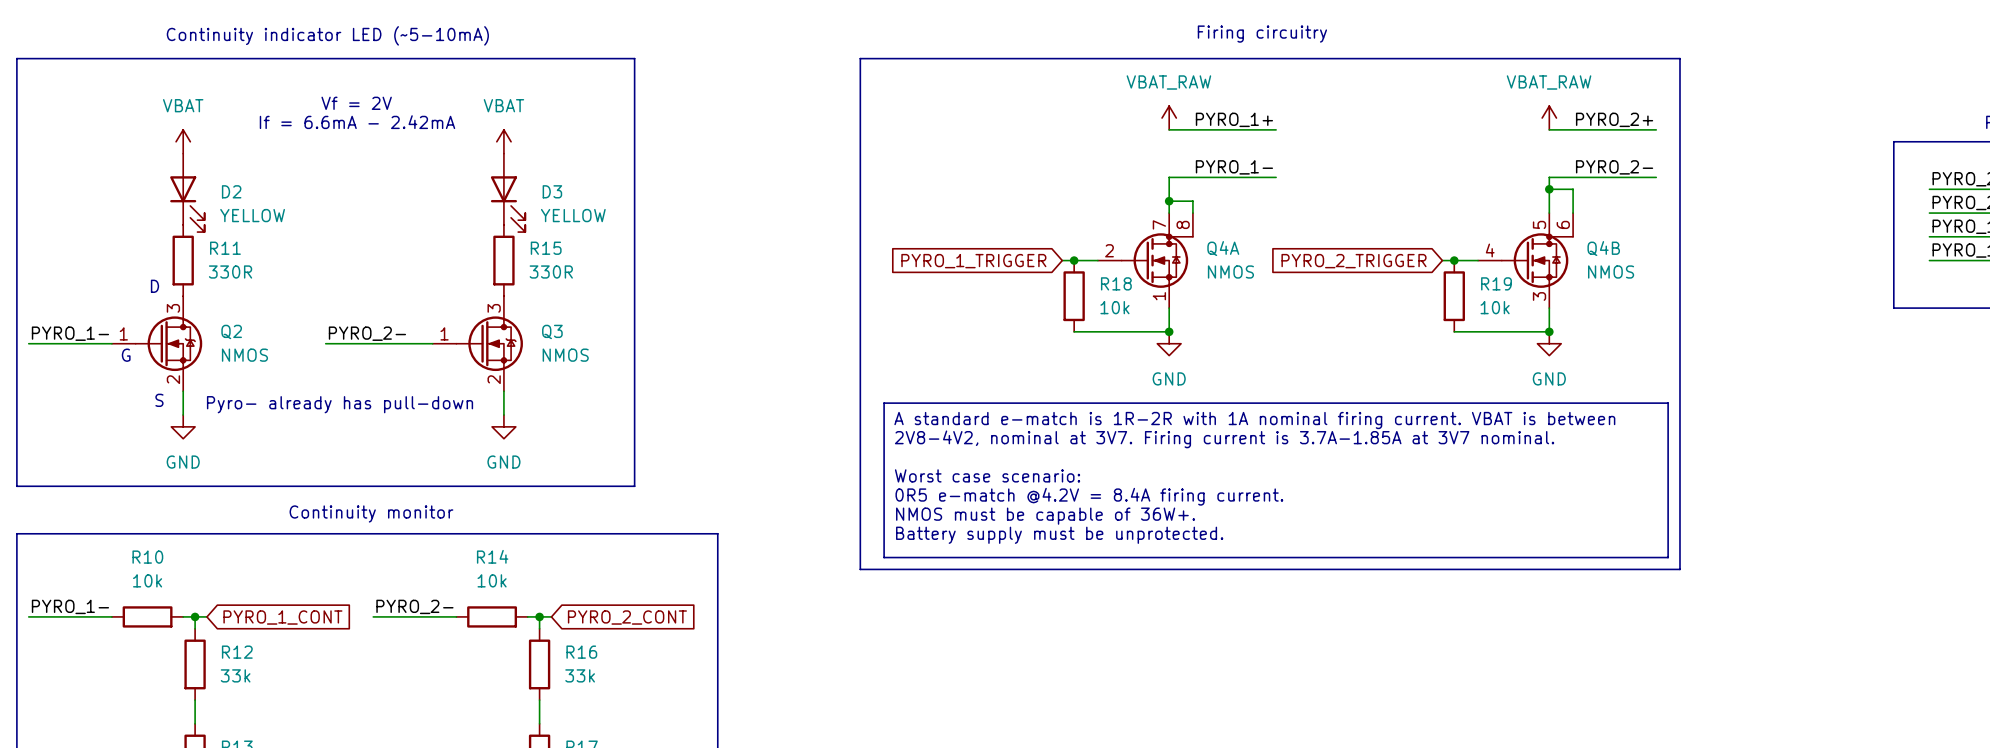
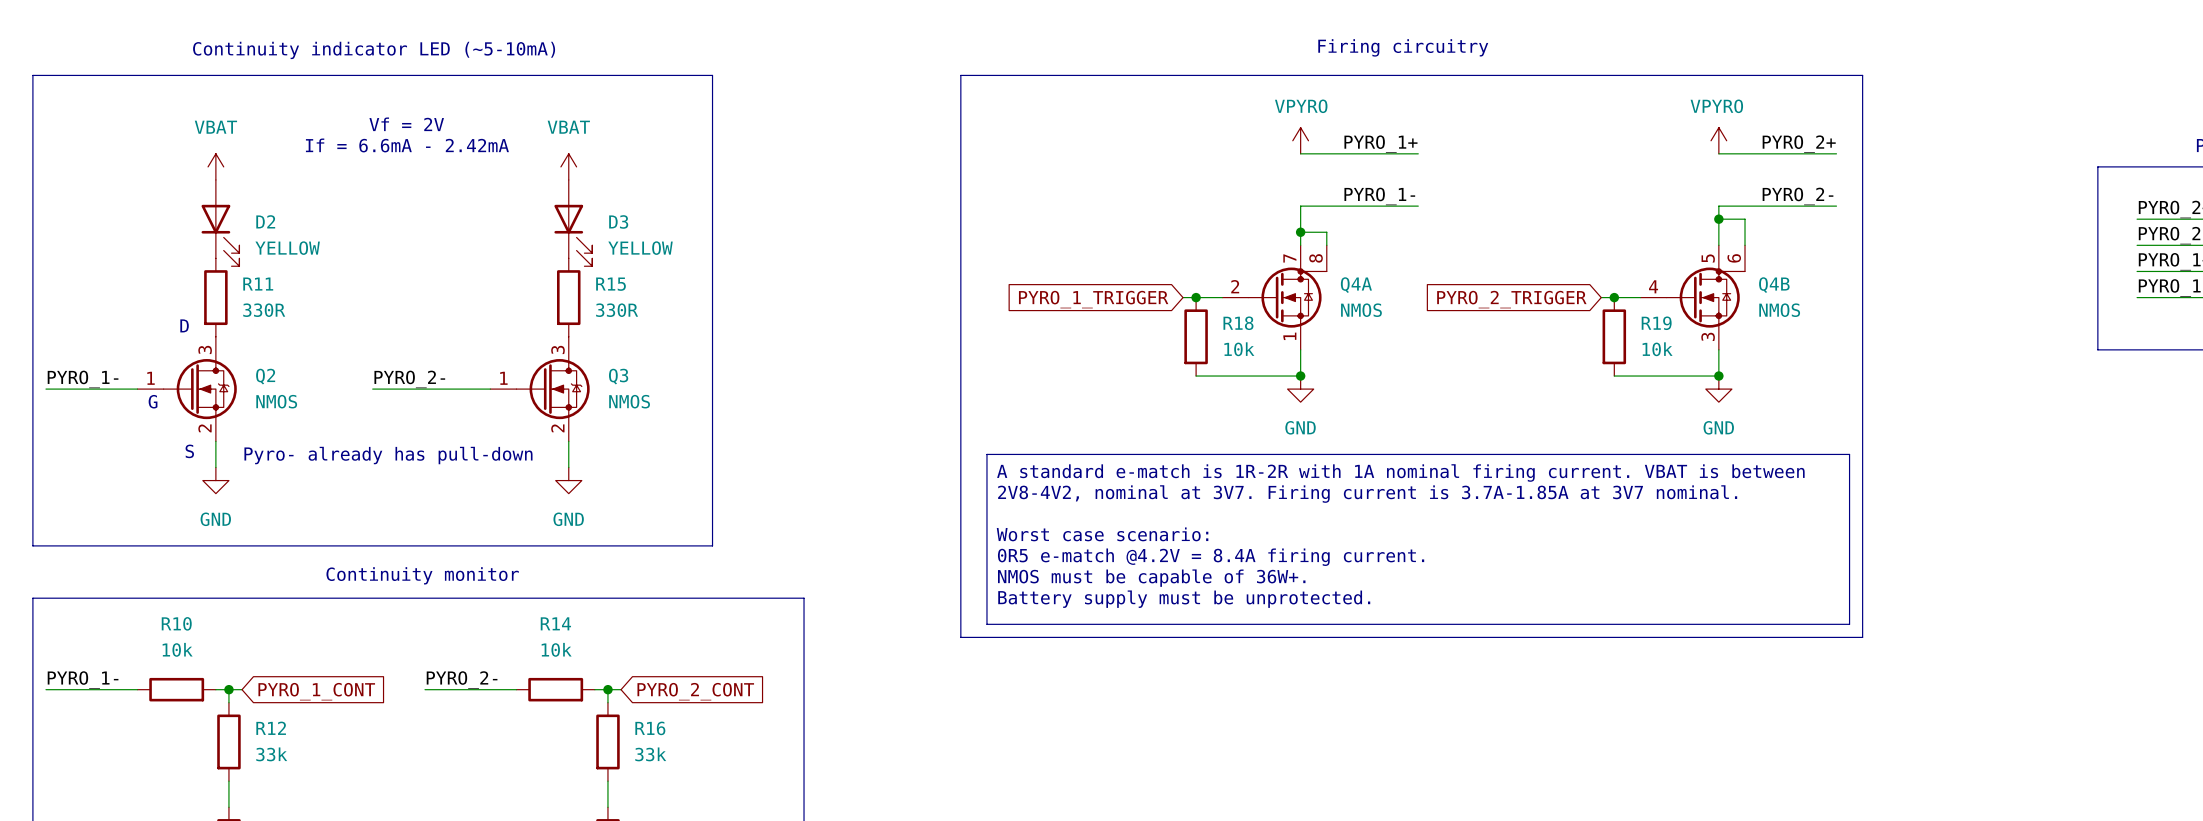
power symbol: VBAT_RAW (1169, 118) -> VPYRO (1300, 140)
power symbol: VBAT_RAW (1549, 118) -> VPYRO (1718, 140)

